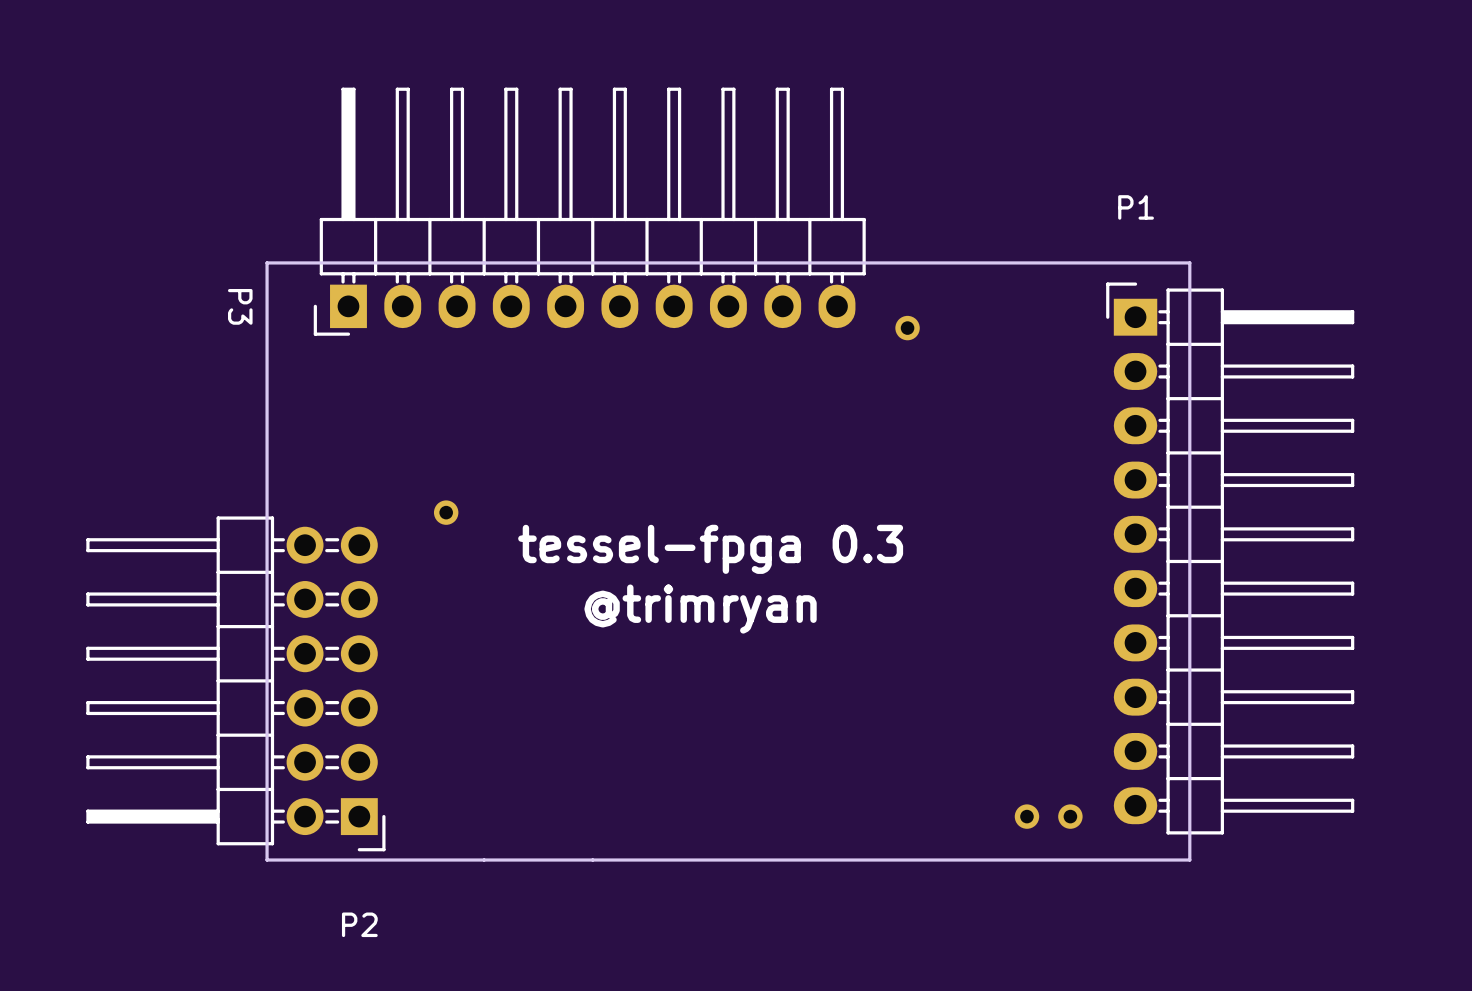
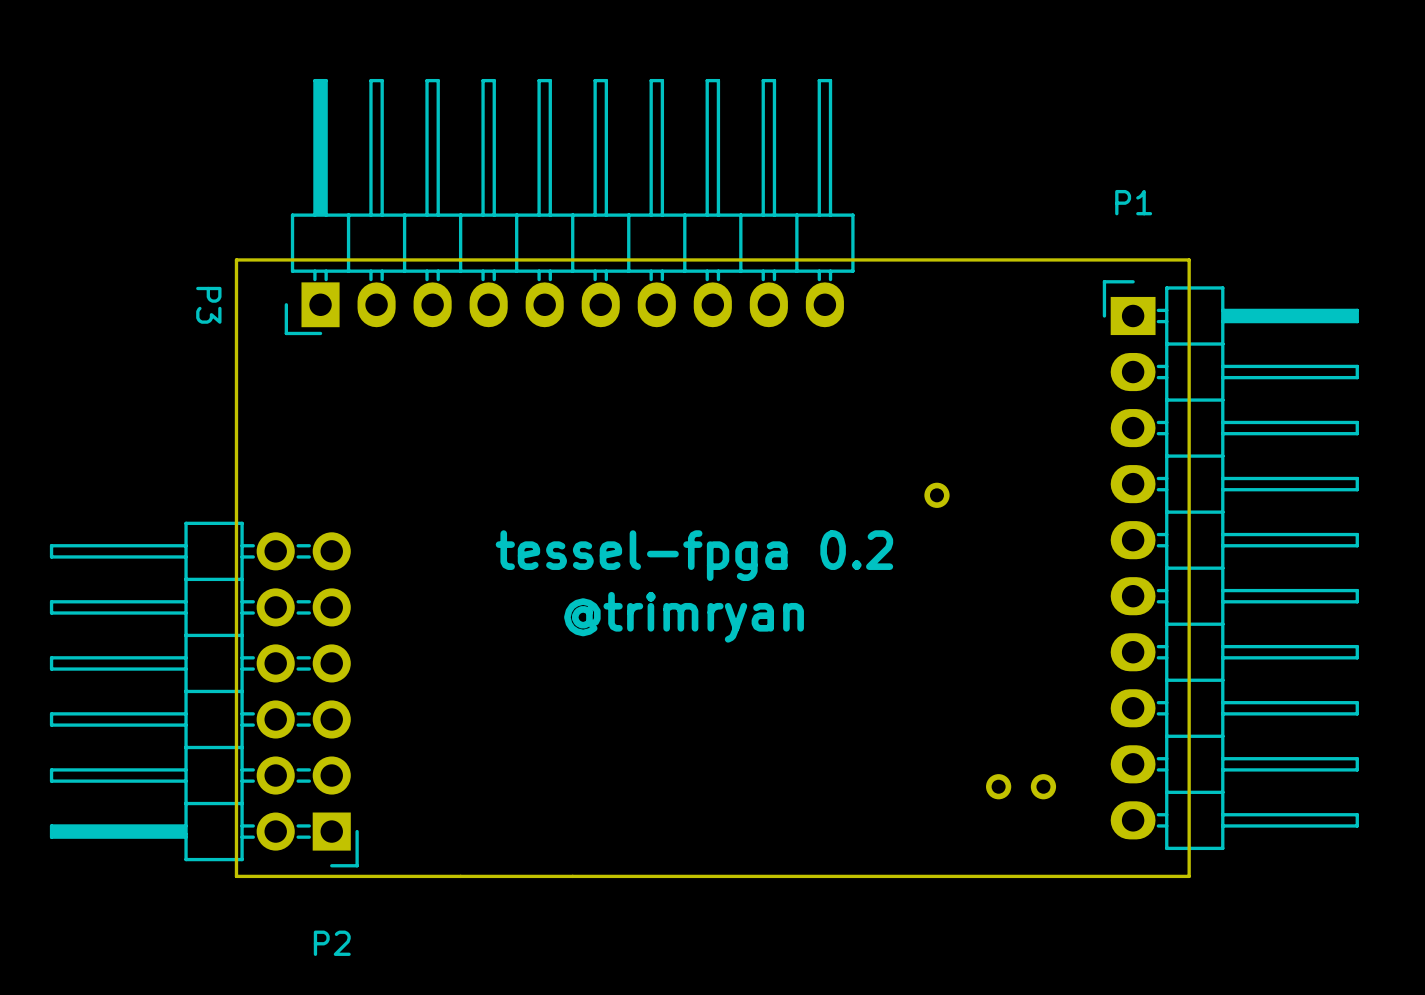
part position: (907, 328) -> (936, 495)
part: (446, 512) -> none
text: tessel-fpga 0.3 (710, 549) -> tessel-fpga 0.2 (694, 555)
part: none -> (998, 786)
part: none -> (1043, 786)
part: (1026, 816) -> none
part: (1070, 816) -> none

